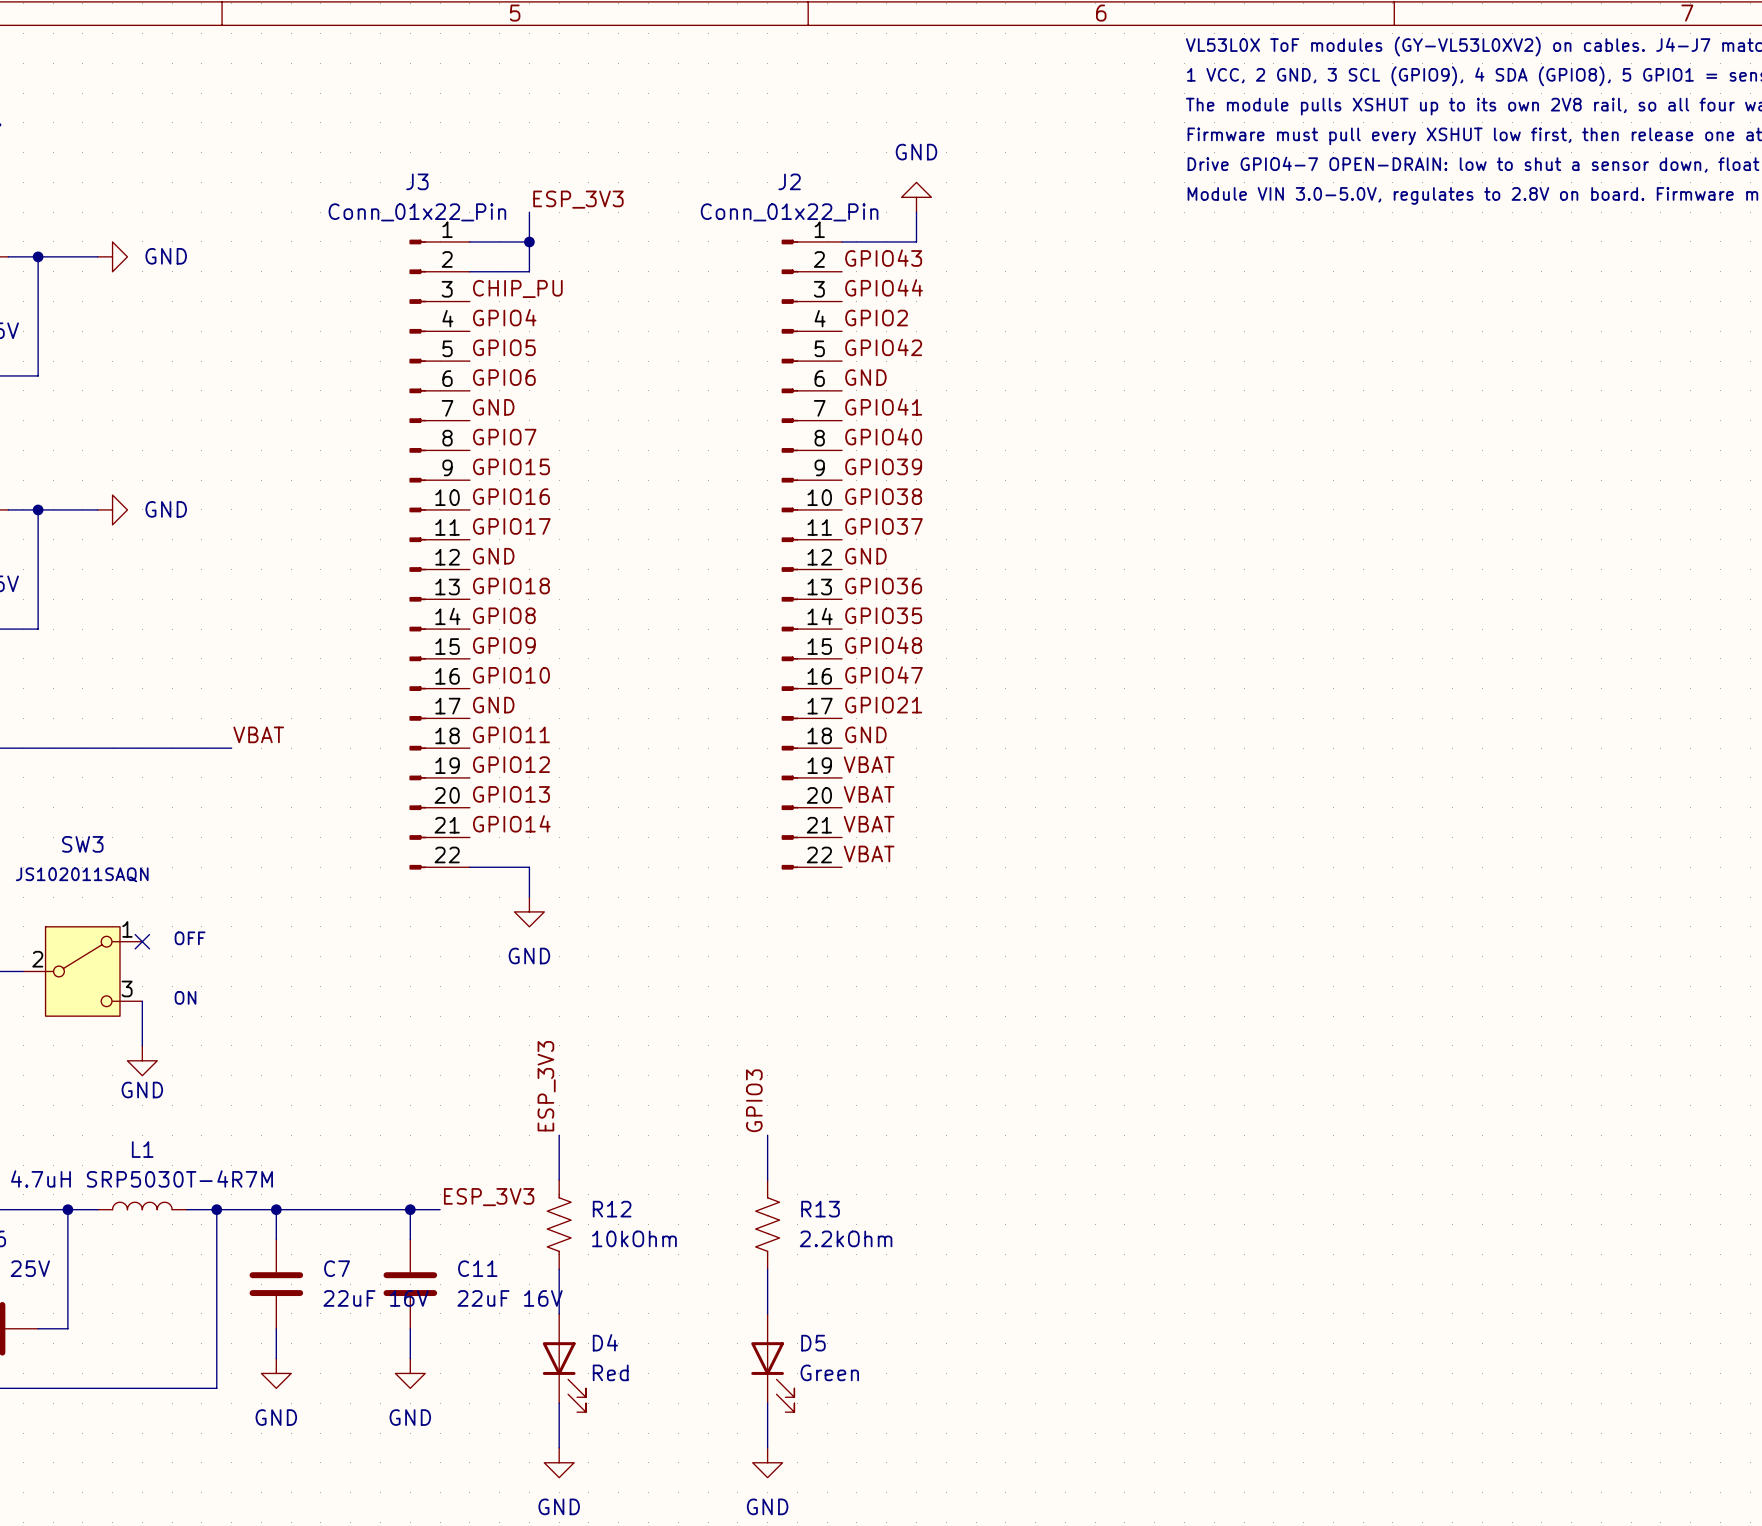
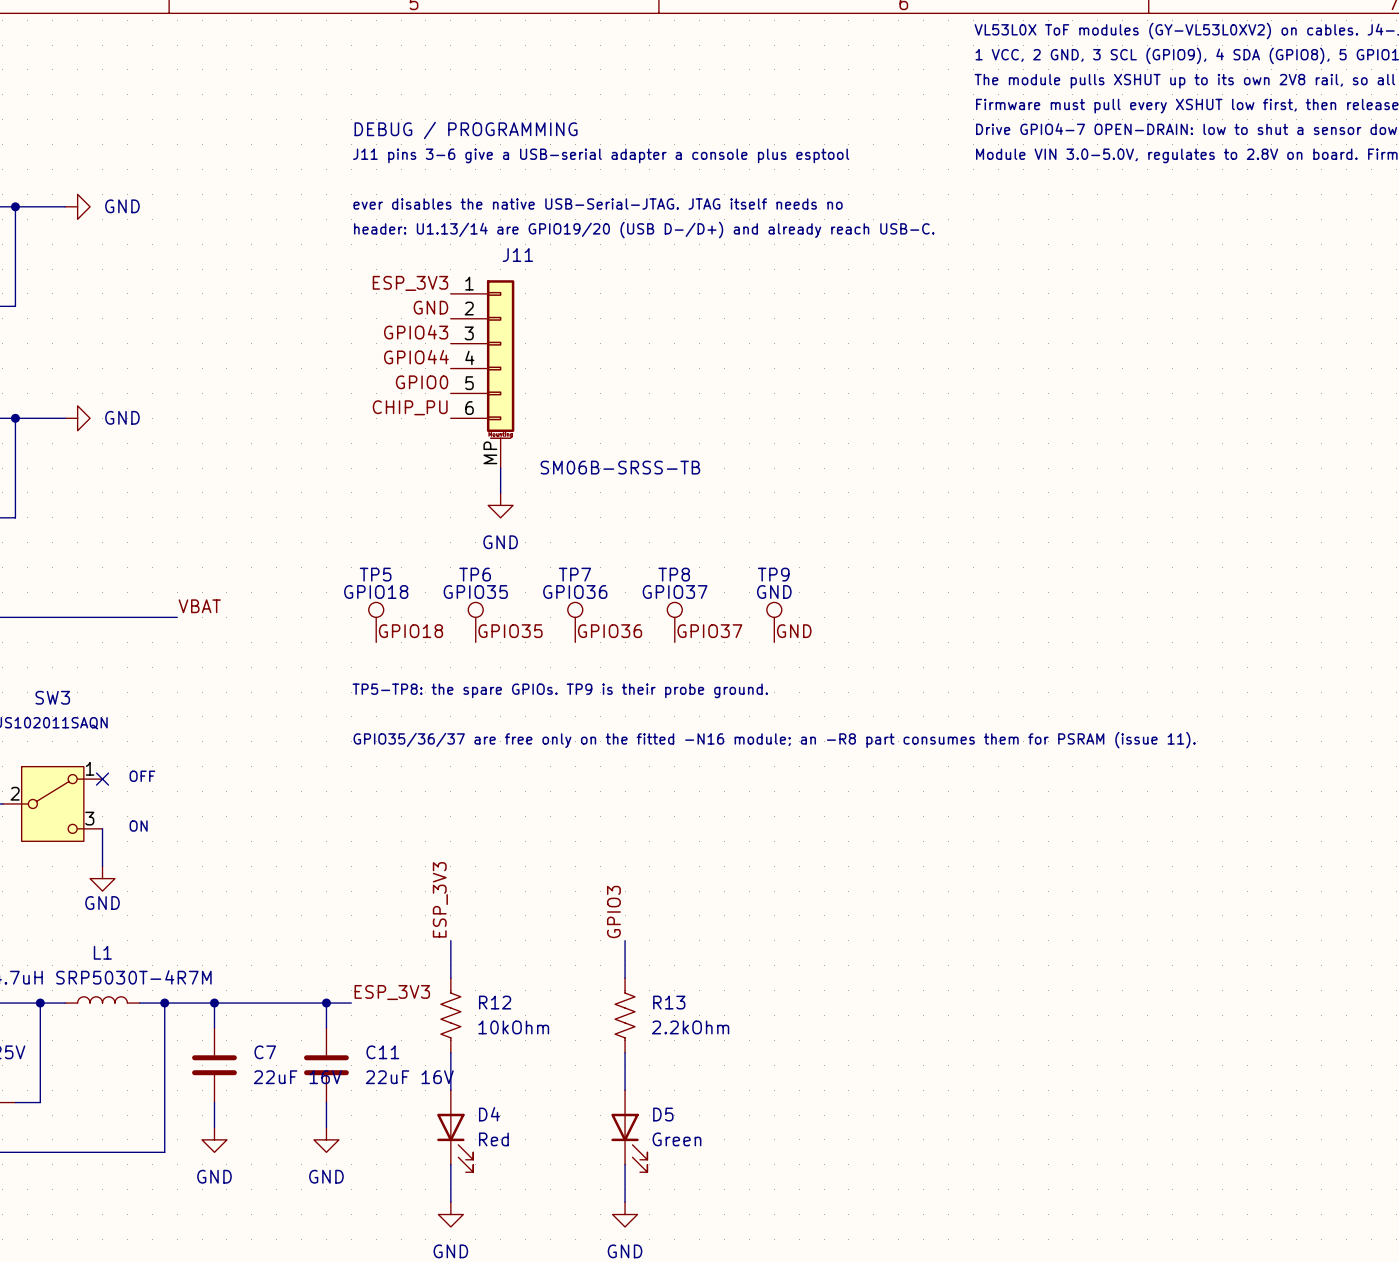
text: none -> DEBUG / PROGRAMMING (466, 130)
text: none -> J11 pins 3-6 give a USB-serial adapter a console plus esptool (601, 155)
power symbol: GND (916, 197) -> none
label position: ESP_3V3 (578, 199) -> ESP_3V3 (410, 283)
wire: (529, 212) (529, 271) (469, 271) -> none
wire: (916, 212) (916, 241) (842, 241) -> none
wire: (469, 241) (529, 241) -> none
junction: (529, 241) -> none
text: none -> ever disables the native USB-Serial-JTAG. JTAG itself needs no (598, 203)
label: GPIO43 (883, 258) -> none
text: none -> header: U1.13/14 are GPIO19/20 (USB D-/D+) and already reach USB-C. (644, 230)
label: GPIO44 (883, 287) -> none
label position: CHIP_PU (517, 288) -> CHIP_PU (410, 407)
label: GPIO4 (504, 317) -> none
label: GPIO2 (876, 318) -> none
label: GPIO5 (504, 347) -> none
label: GPIO42 (883, 347) -> none
label: GPIO6 (504, 377) -> none
label: GND (865, 377) -> none
label: none -> GPIO43 (416, 332)
label: GPIO41 (883, 406) -> none
label position: GND (493, 407) -> GND (430, 307)
label: none -> GPIO44 (416, 357)
label: GPIO40 (883, 436) -> none
label: GPIO7 (504, 437) -> none
J11: none -> SM06B-SRSS-TB (482, 374)
label: GPIO15 (511, 466) -> none
label: none -> GPIO0 (422, 382)
label: GPIO39 (883, 466) -> none
label: GPIO16 (511, 496) -> none
label: GPIO38 (883, 496) -> none
label: GPIO17 (511, 526) -> none
label position: GPIO37 (883, 526) -> GPIO37 (709, 631)
J3: Conn_01x22_Pin (439, 554) -> none
J2: Conn_01x22_Pin (811, 554) -> none
label: GND (493, 556) -> none
label: GND (865, 556) -> none
wire: none -> (500, 468) (500, 492)
label: GPIO18 (511, 586) -> none
label position: GPIO36 (883, 586) -> GPIO36 (610, 631)
power symbol: none -> GND (500, 505)
label: GPIO8 (504, 615) -> none
label: GPIO35 (883, 615) -> none
label: GPIO9 (504, 645) -> none
label: GPIO48 (883, 645) -> none
label: GPIO47 (883, 674) -> none
label: GPIO10 (511, 675) -> none
label: GND (493, 705) -> none
label: GPIO21 (883, 705) -> none
label: GPIO11 (511, 734) -> none
label position: GND (865, 734) -> GND (794, 631)
TP5: none -> GPIO18 (376, 622)
TP6: none -> GPIO35 (475, 622)
TP7: none -> GPIO36 (575, 622)
TP8: none -> GPIO37 (674, 622)
TP9: none -> GND (774, 622)
label: GPIO12 (511, 764) -> GPIO18 (410, 631)
label: none -> GPIO35 (510, 631)
label: VBAT (869, 764) -> none
label: GPIO13 (511, 794) -> none
label: VBAT (869, 794) -> none
label: GPIO14 (511, 823) -> none
label: VBAT (869, 824) -> none
text: none -> TP5-TP8: the spare GPIOs. TP9 is their probe ground. (560, 690)
label: VBAT (869, 853) -> none
wire: (469, 867) (529, 867) (529, 897) -> none
text: none -> GPIO35/36/37 are free only on the fitted -N16 module; an -R8 part consumes them for PSRAM (issue 11). (774, 740)
power symbol: GND (529, 911) -> none

